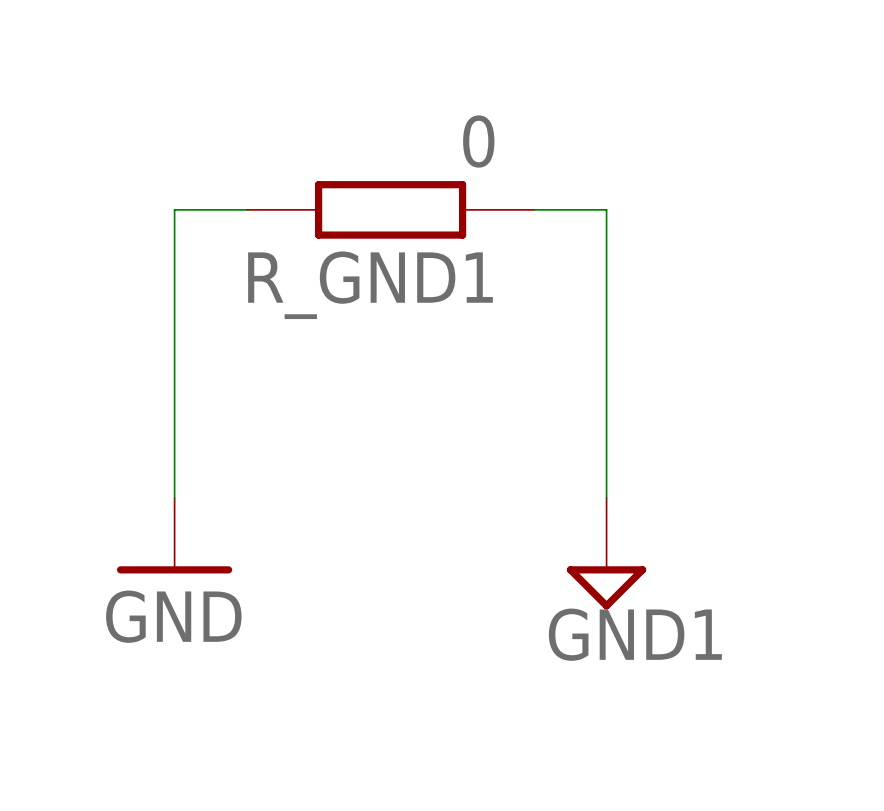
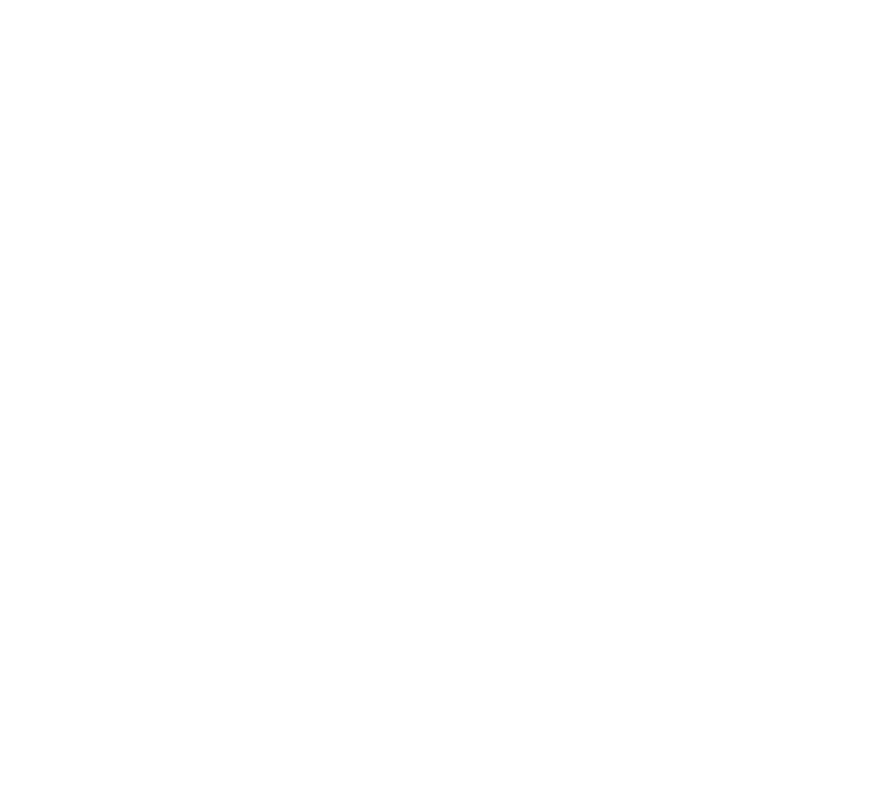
wire: (246, 209) (174, 209) (174, 497) -> none
R_GND1: 0 (390, 209) -> none
wire: (534, 209) (606, 209) (606, 497) -> none
power symbol: GND (174, 535) -> none
power symbol: GND1 (606, 553) -> none

